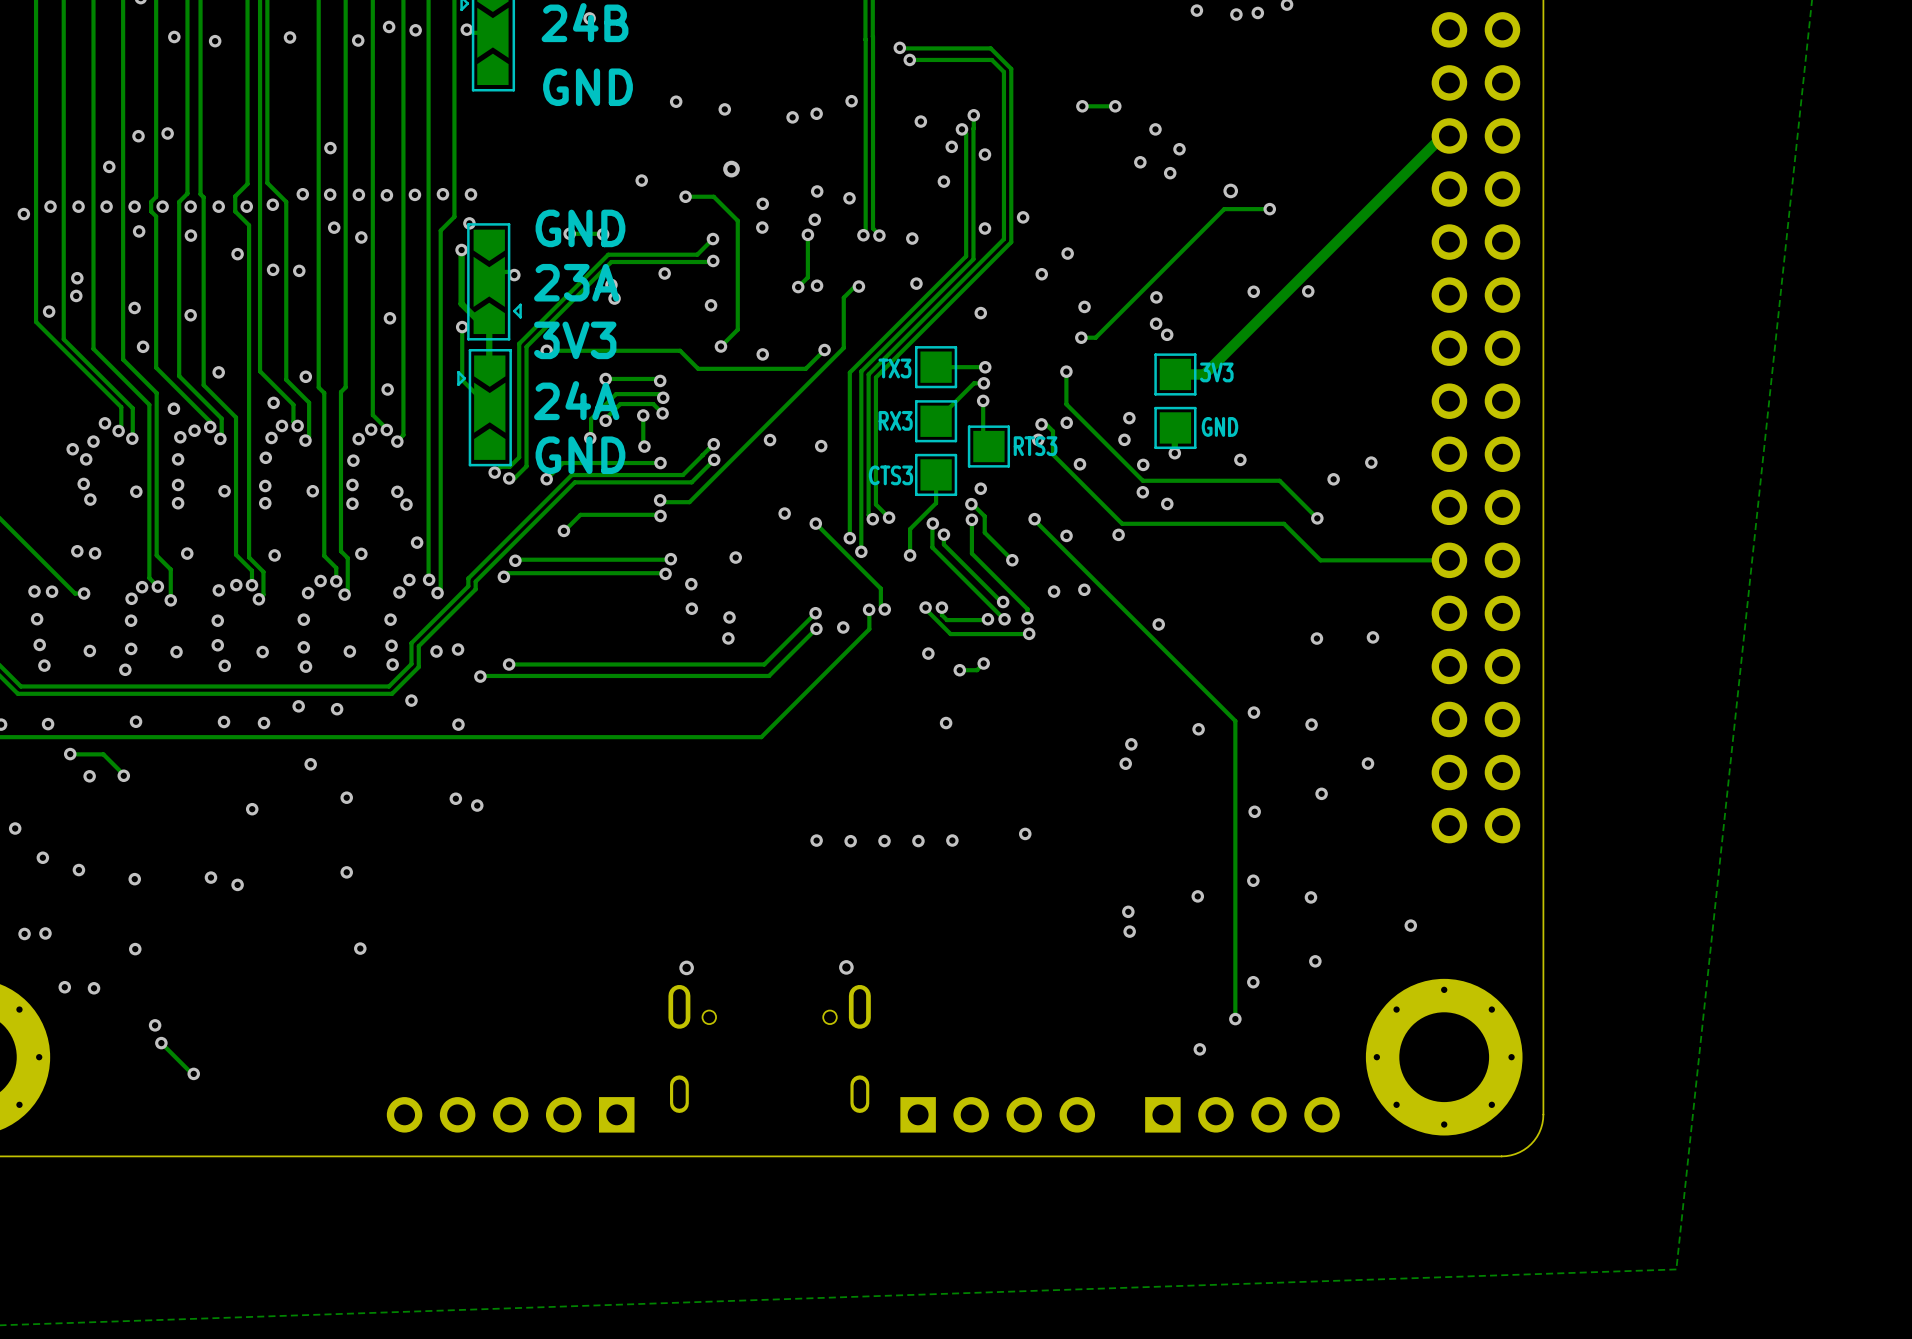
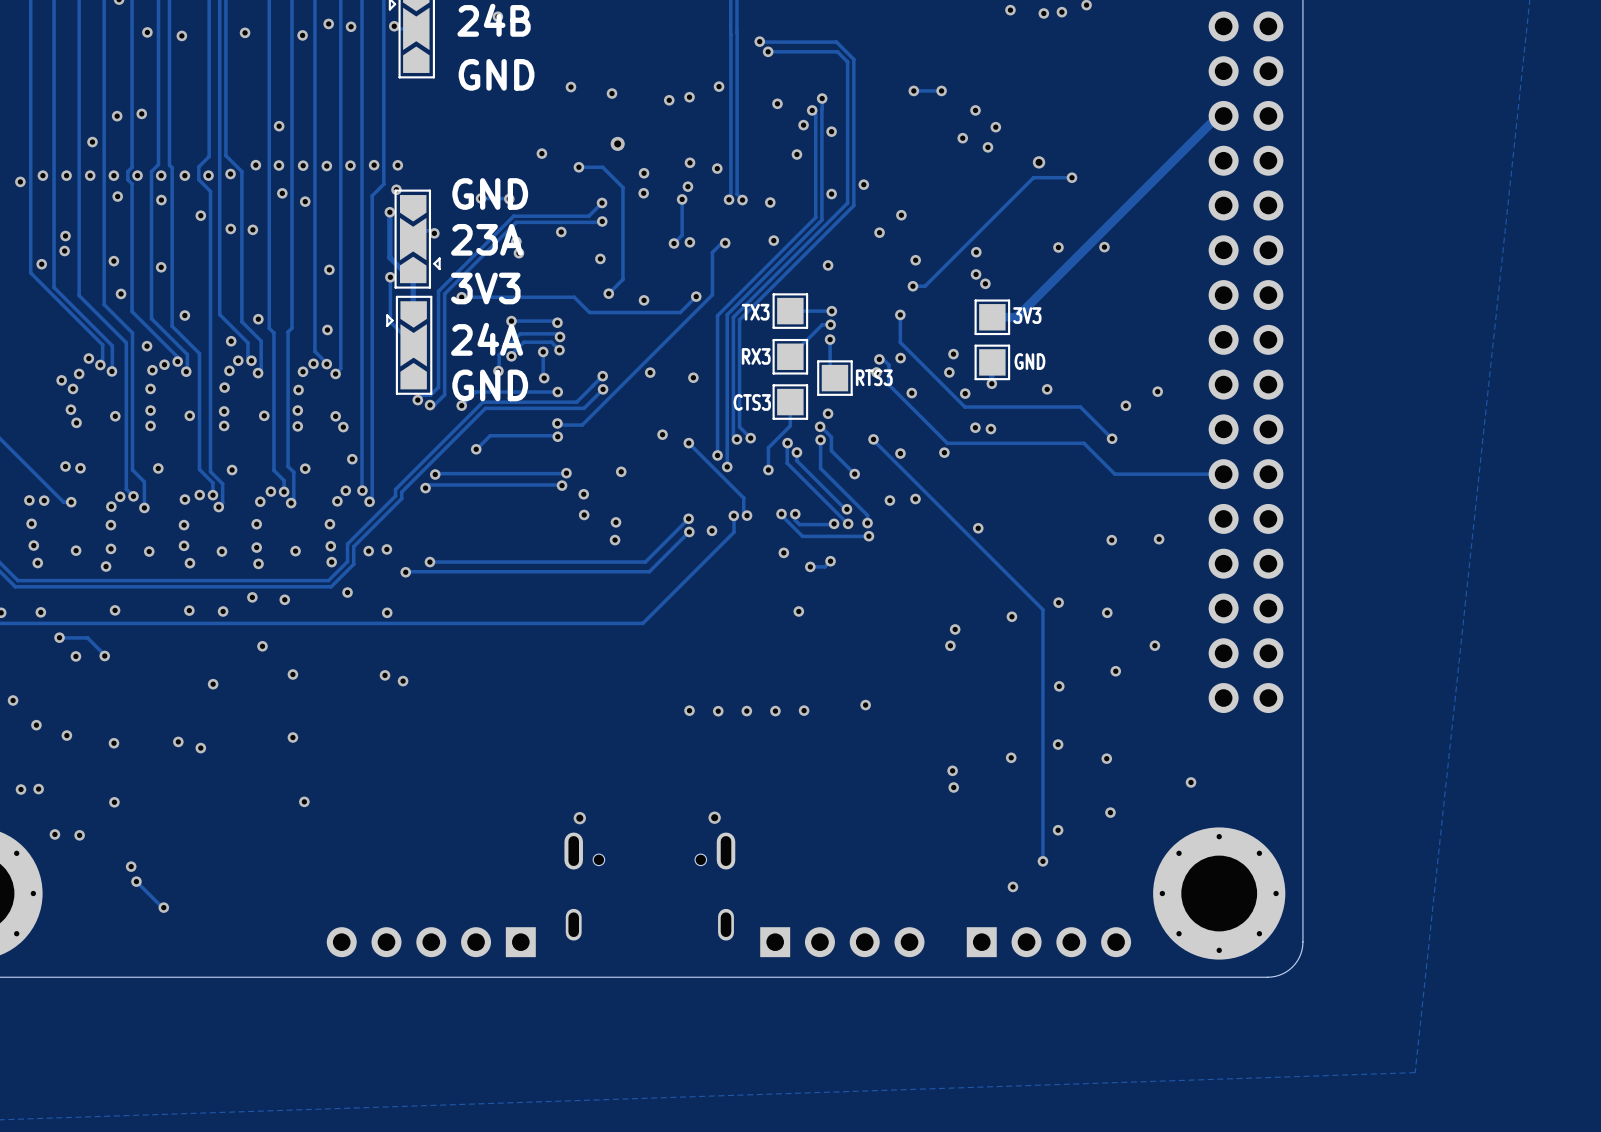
via: (1142, 492) -> none
via: (1167, 503) -> none
via: none -> (975, 427)
via: none -> (990, 429)

